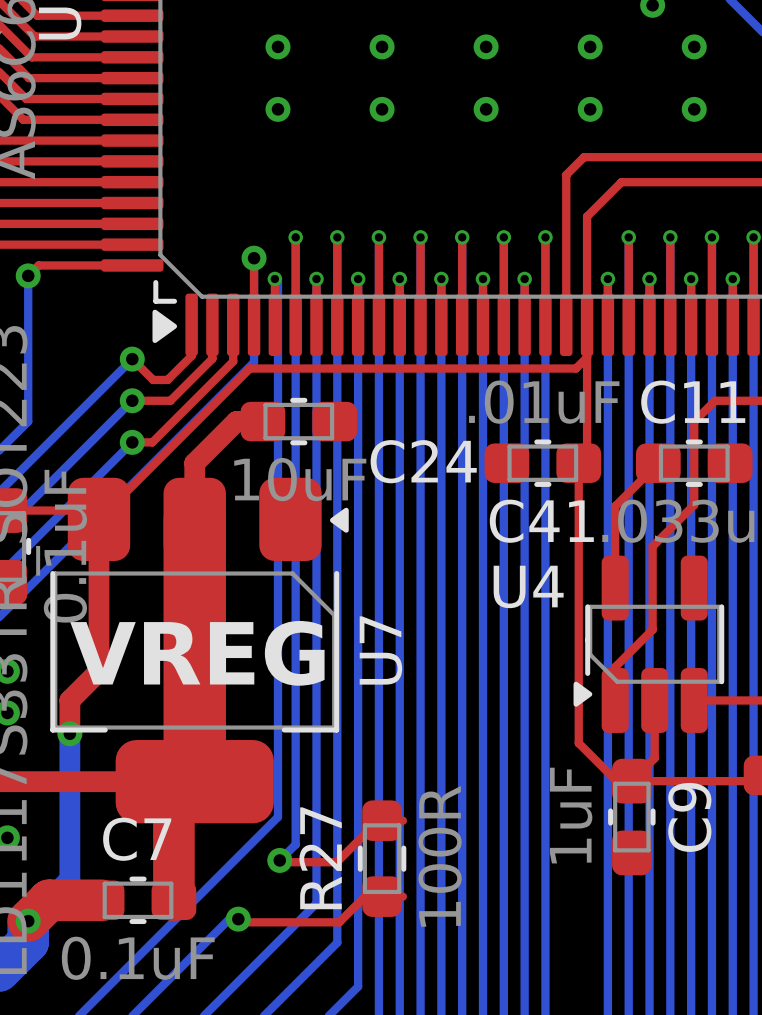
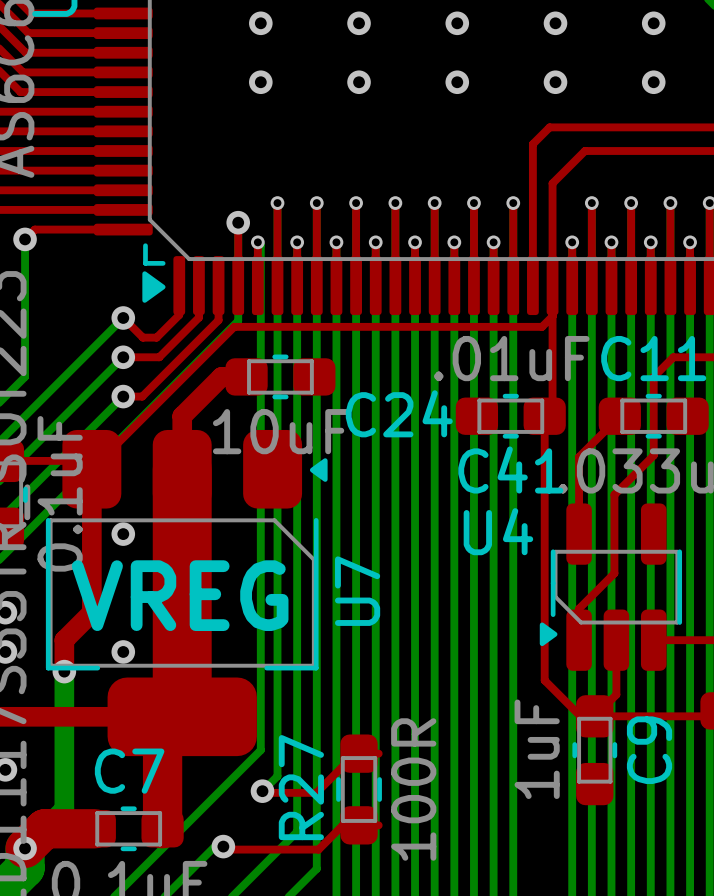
via: none -> (123, 534)
via: none -> (123, 651)

